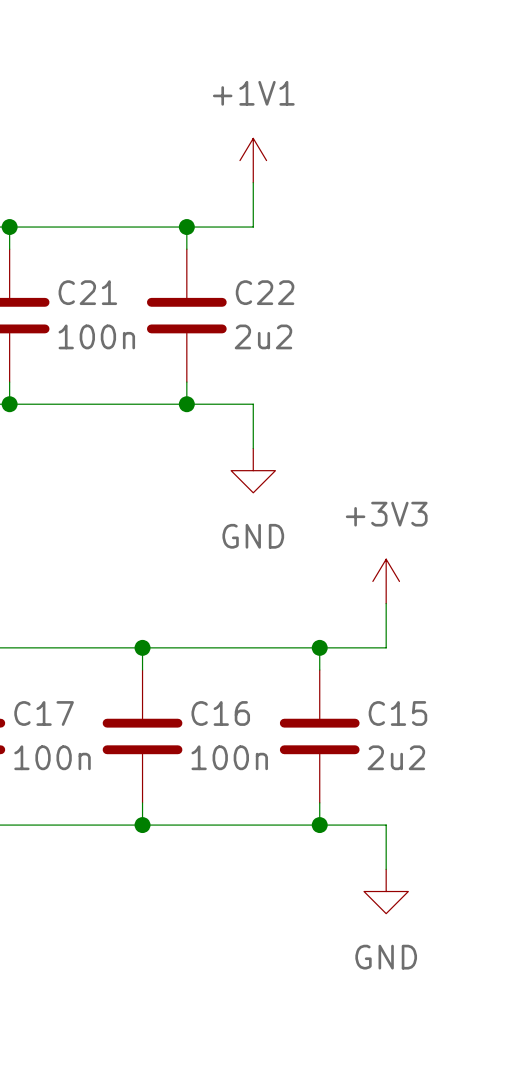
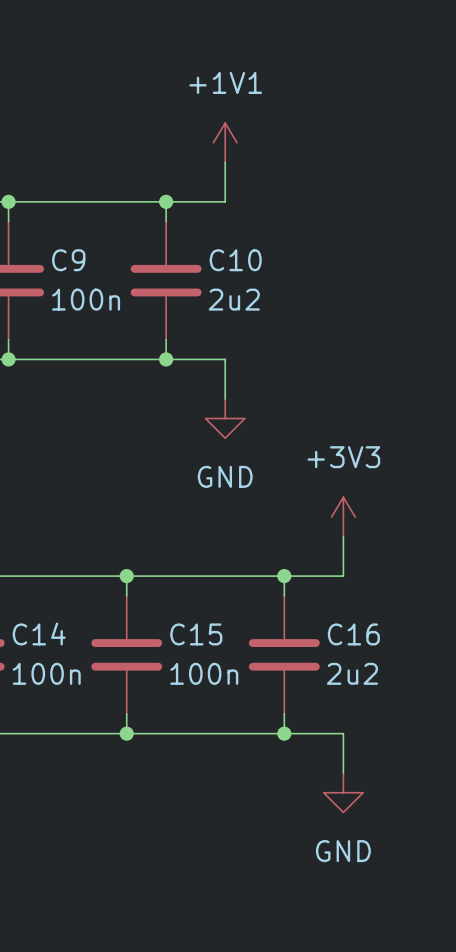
C21 name: C21 (87, 292) -> C9 (68, 260)
C22 name: C22 (265, 292) -> C10 (235, 260)
C17 name: C17 (44, 713) -> C14 (39, 633)
C16 name: C16 (220, 713) -> C15 (196, 634)
C15 name: C15 (397, 713) -> C16 (353, 634)

